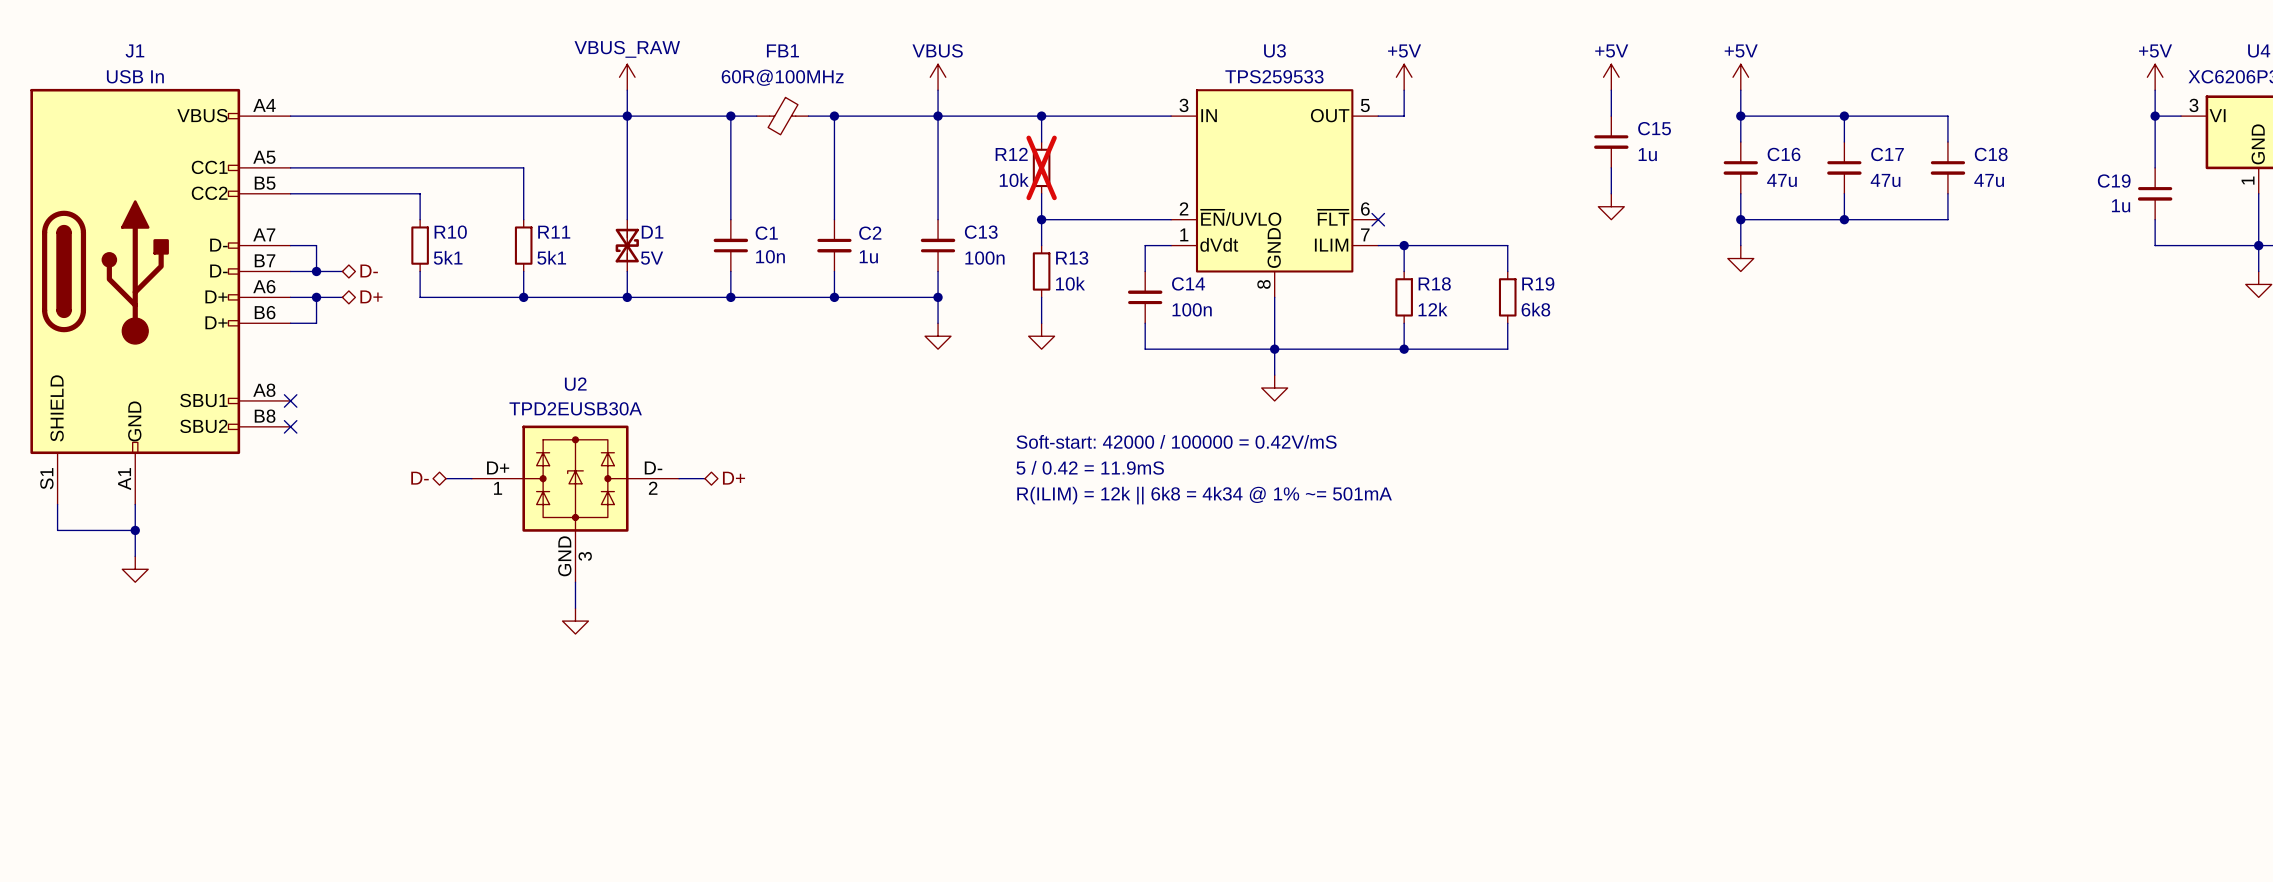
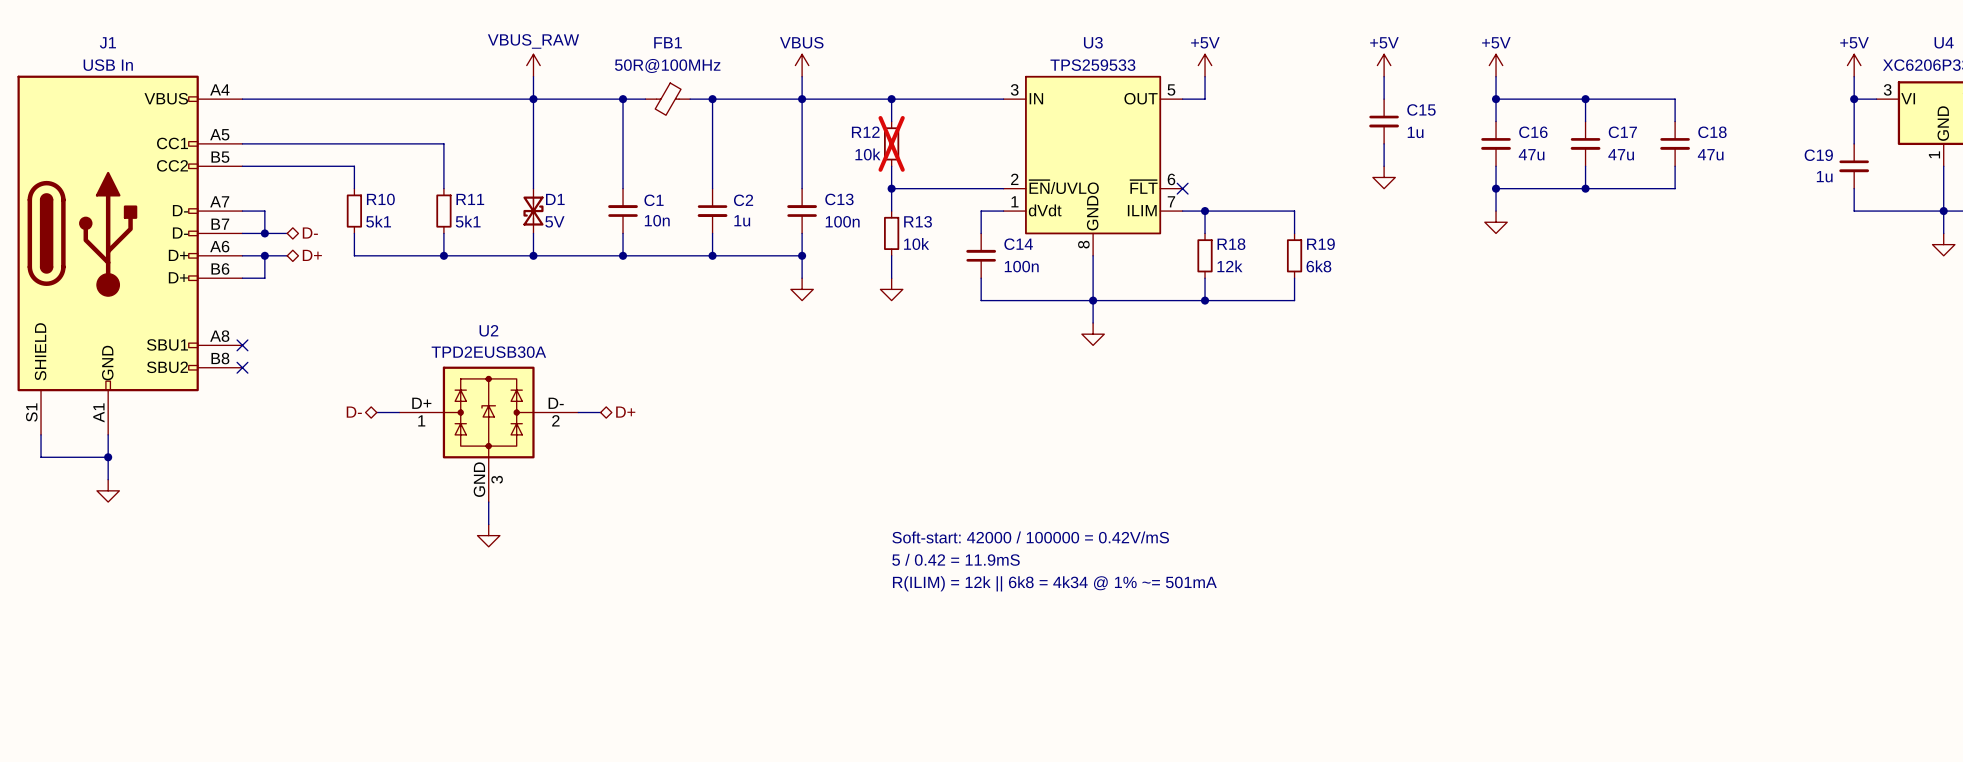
FB1 value: 60R@100MHz (782, 77) -> 50R@100MHz (667, 65)
text position: Soft-start: 42000 / 100000 = 0.42V/mS (1176, 441) -> Soft-start: 42000 / 100000 = 0.42V/mS (1030, 537)
text position: 5 / 0.42 = 11.9mS (1090, 467) -> 5 / 0.42 = 11.9mS (956, 559)
text position: R(ILIM) = 12k || 6k8 = 4k34 @ 1% ~= 501mA (1204, 495) -> R(ILIM) = 12k || 6k8 = 4k34 @ 1% ~= 501mA (1054, 583)

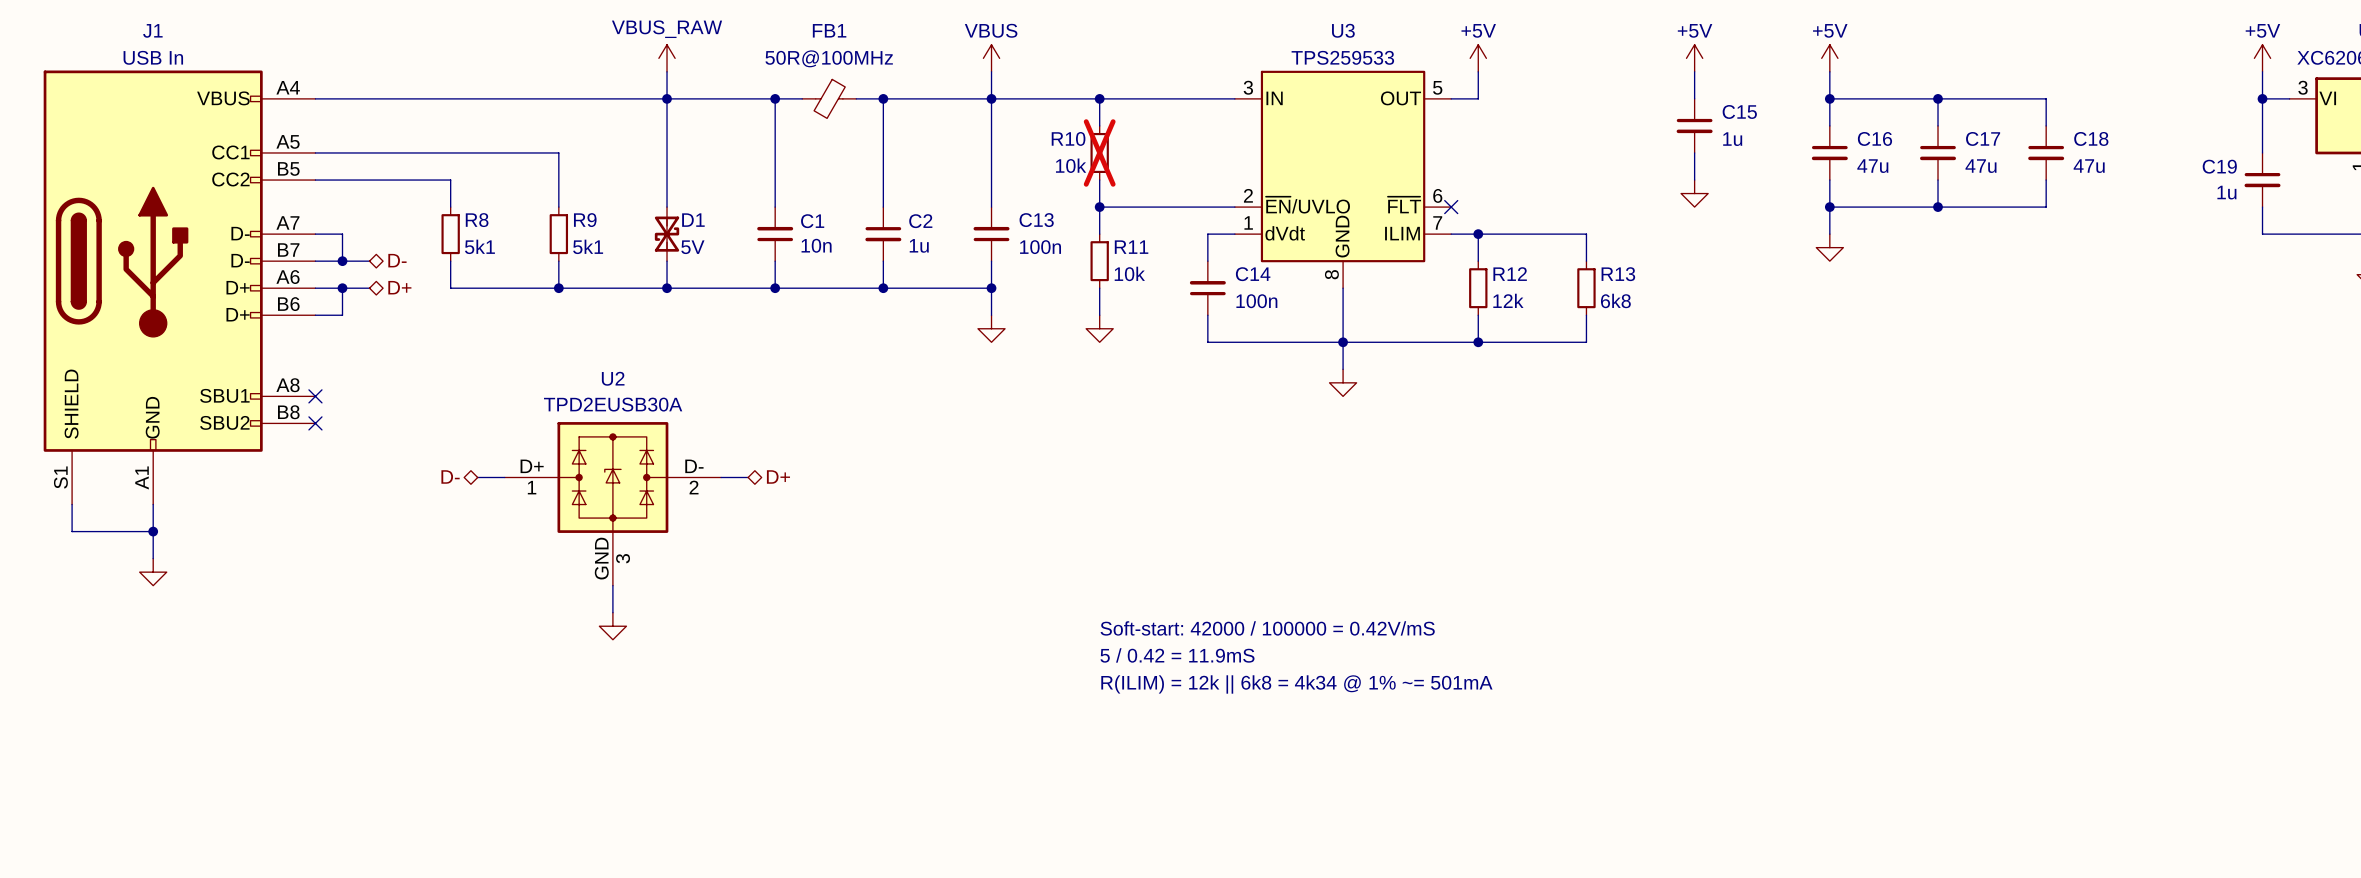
R12 name: R12 (865, 132) -> R10 (1068, 138)
R10 name: R10 (380, 199) -> R8 (477, 220)
R11 name: R11 (470, 199) -> R9 (585, 220)
R13 name: R13 (918, 221) -> R11 (1131, 247)
R18 name: R18 (1231, 244) -> R12 (1510, 274)
R19 name: R19 (1320, 244) -> R13 (1618, 274)

